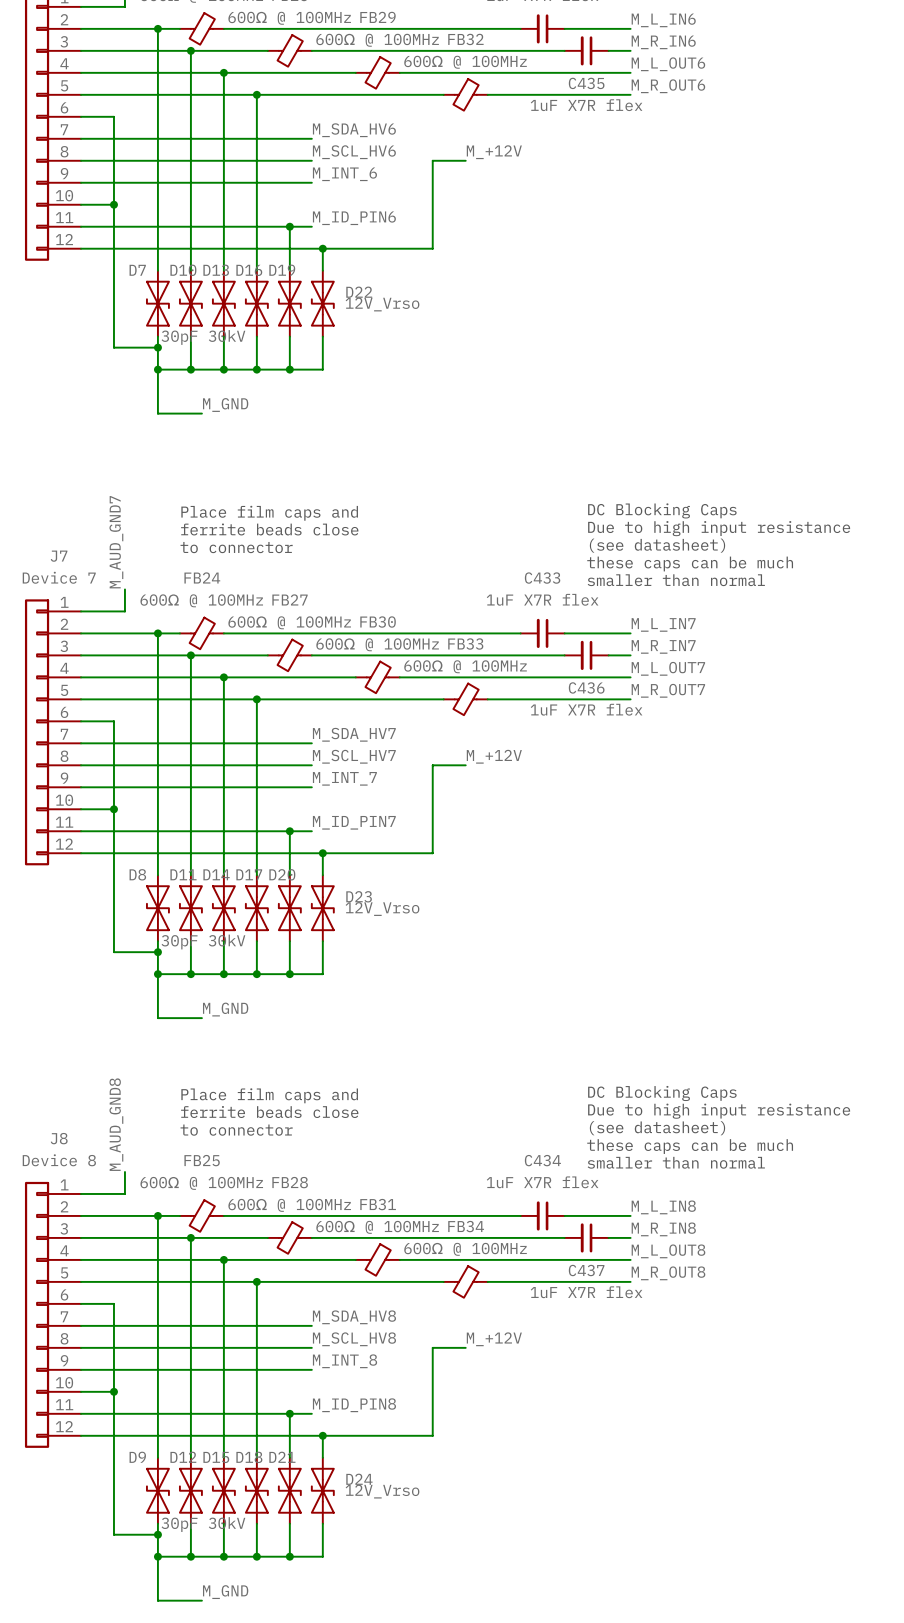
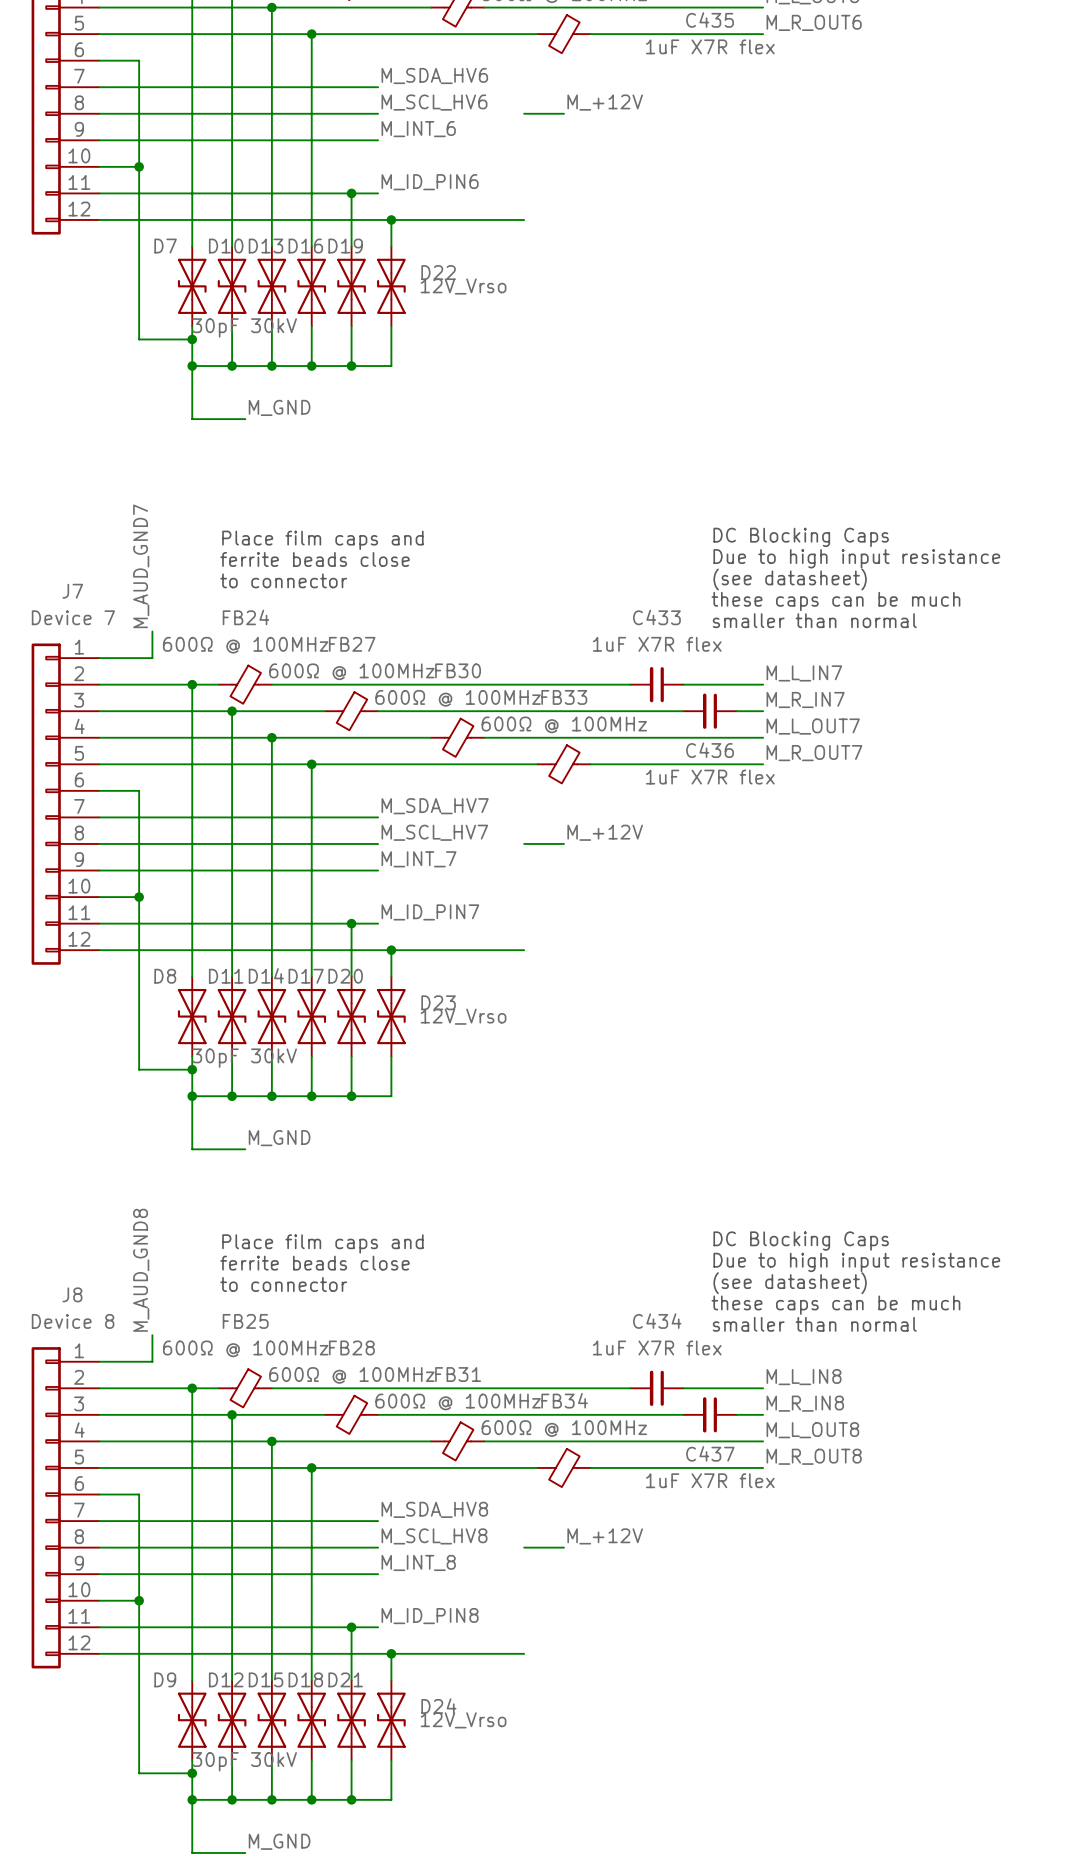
wire: (432, 160) (432, 248) -> none
wire: (432, 765) (432, 853) -> none
wire: (432, 1347) (432, 1435) -> none

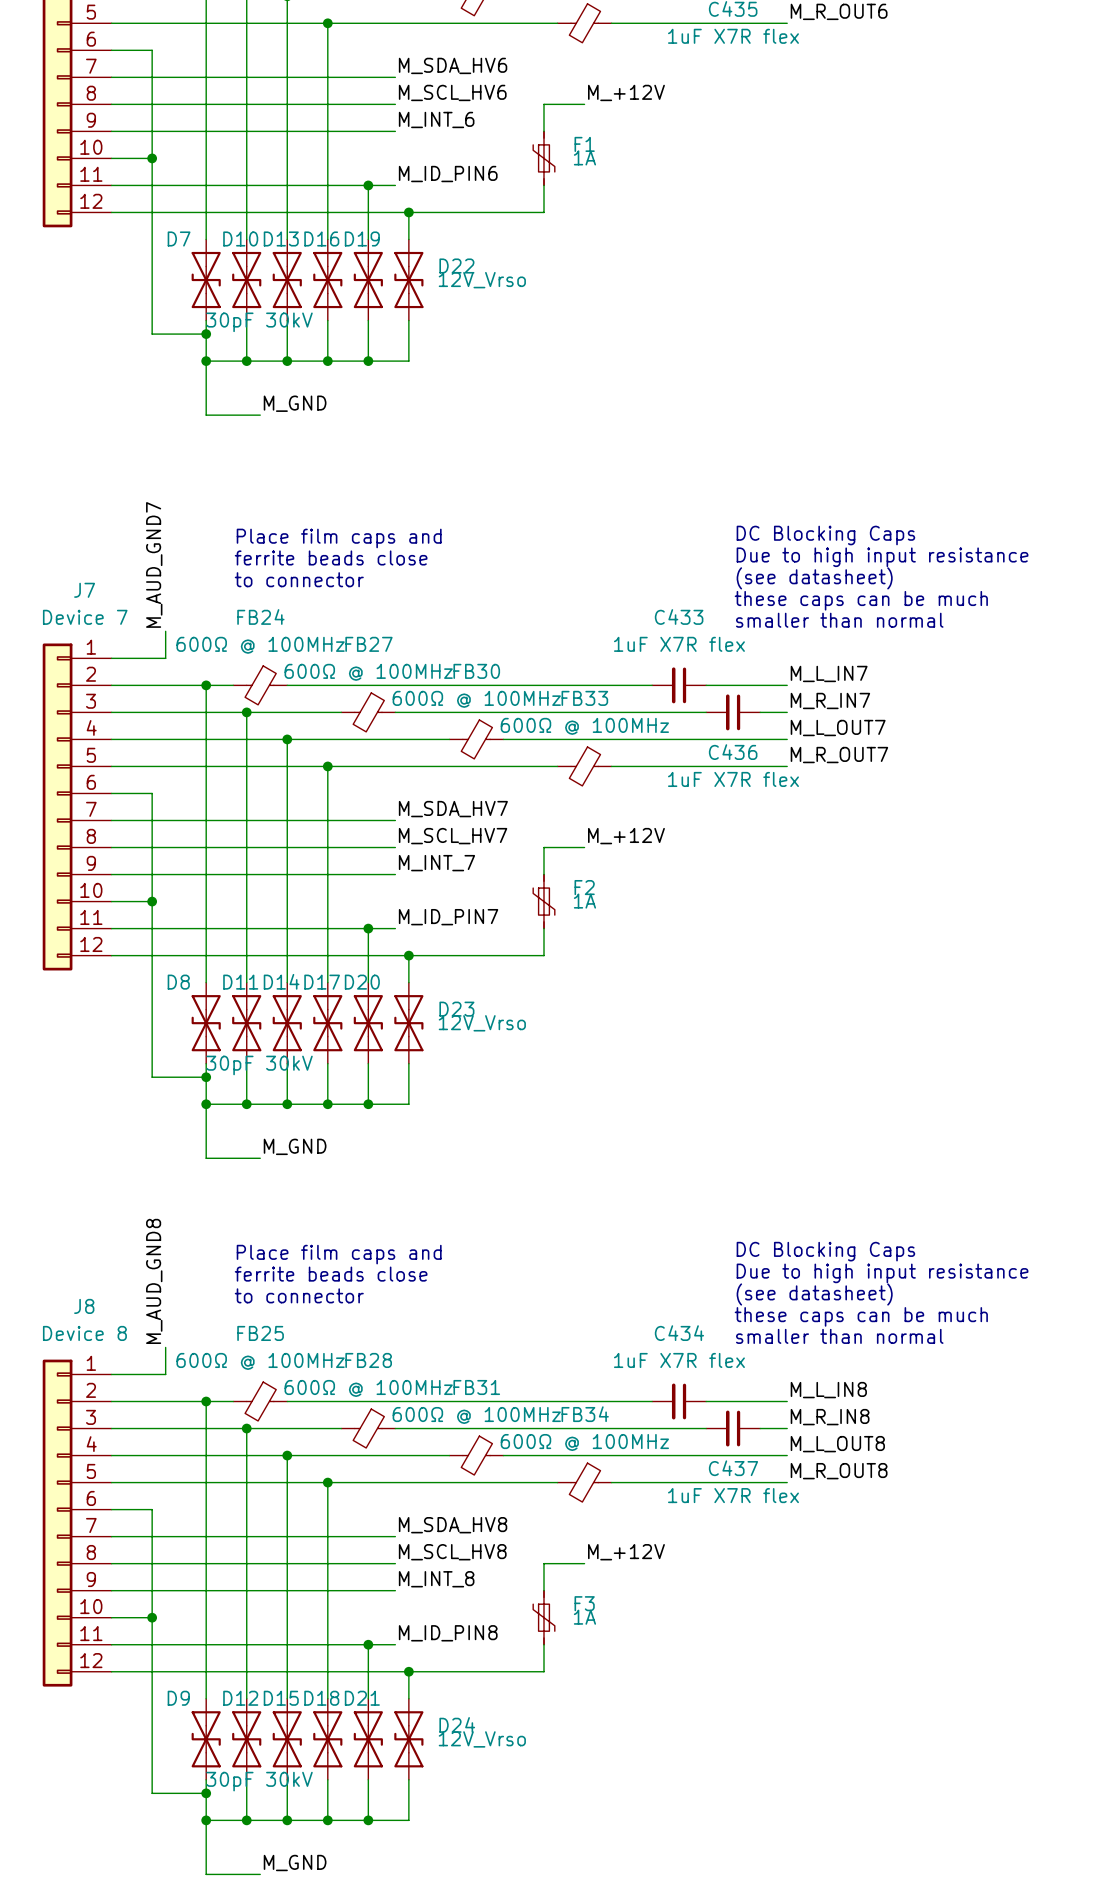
wire: none -> (543, 104) (543, 131)
F1: none -> 1A (543, 158)
wire: none -> (543, 185) (543, 212)
wire: none -> (543, 847) (543, 874)
F2: none -> 1A (543, 901)
wire: none -> (543, 928) (543, 955)
wire: none -> (543, 1563) (543, 1590)
F3: none -> 1A (543, 1617)
wire: none -> (543, 1644) (543, 1671)

